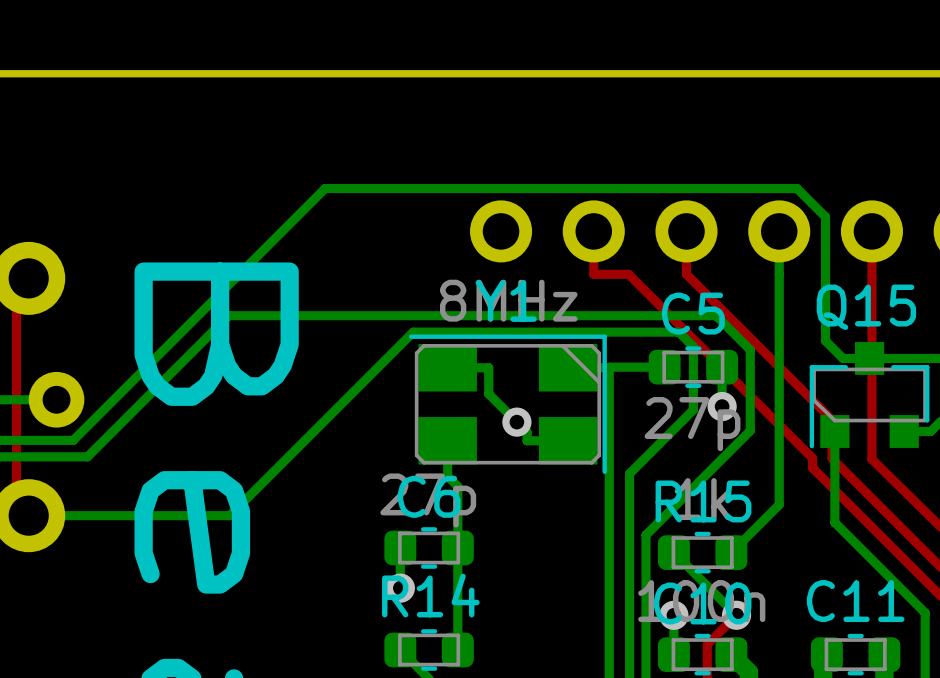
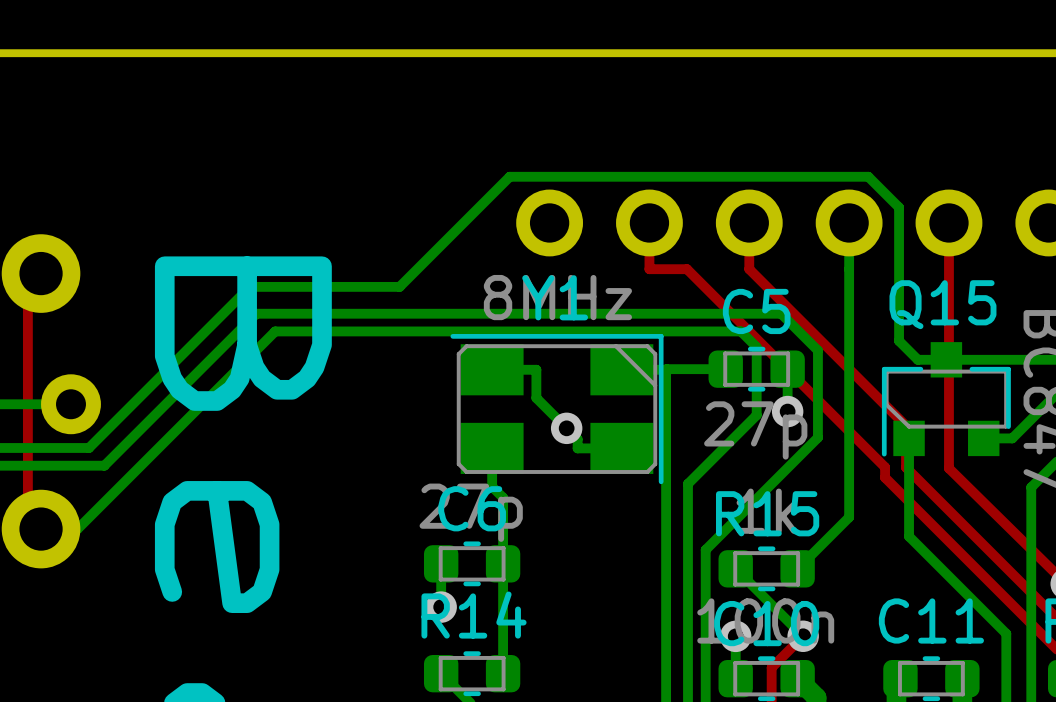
bottom track: (464, 188) (325, 188) (222, 290) -> (509, 176) (399, 286) (250, 286)
bottom track: (413, 332) (229, 515) (62, 515) -> (455, 331) (275, 331) (77, 529)

